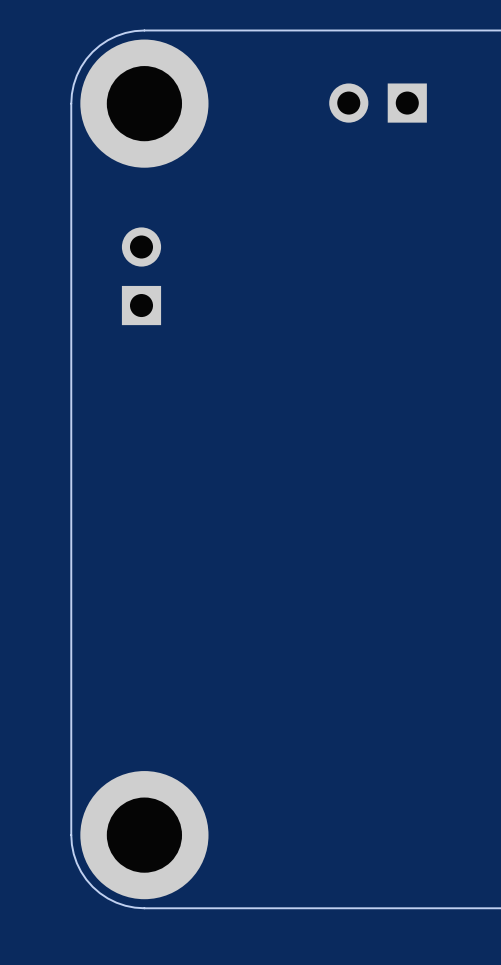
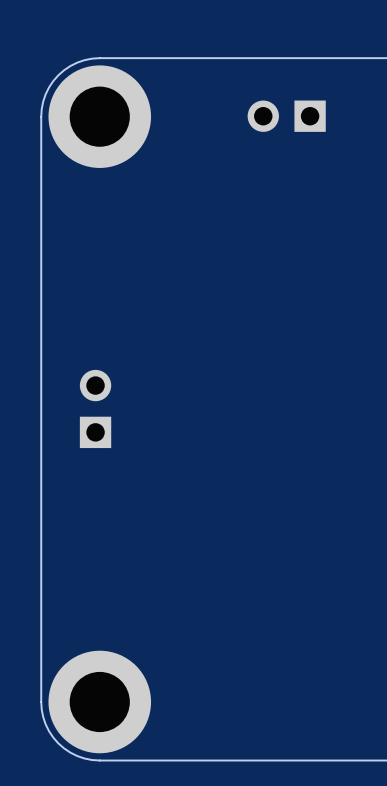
part position: (141, 276) -> (95, 408)

